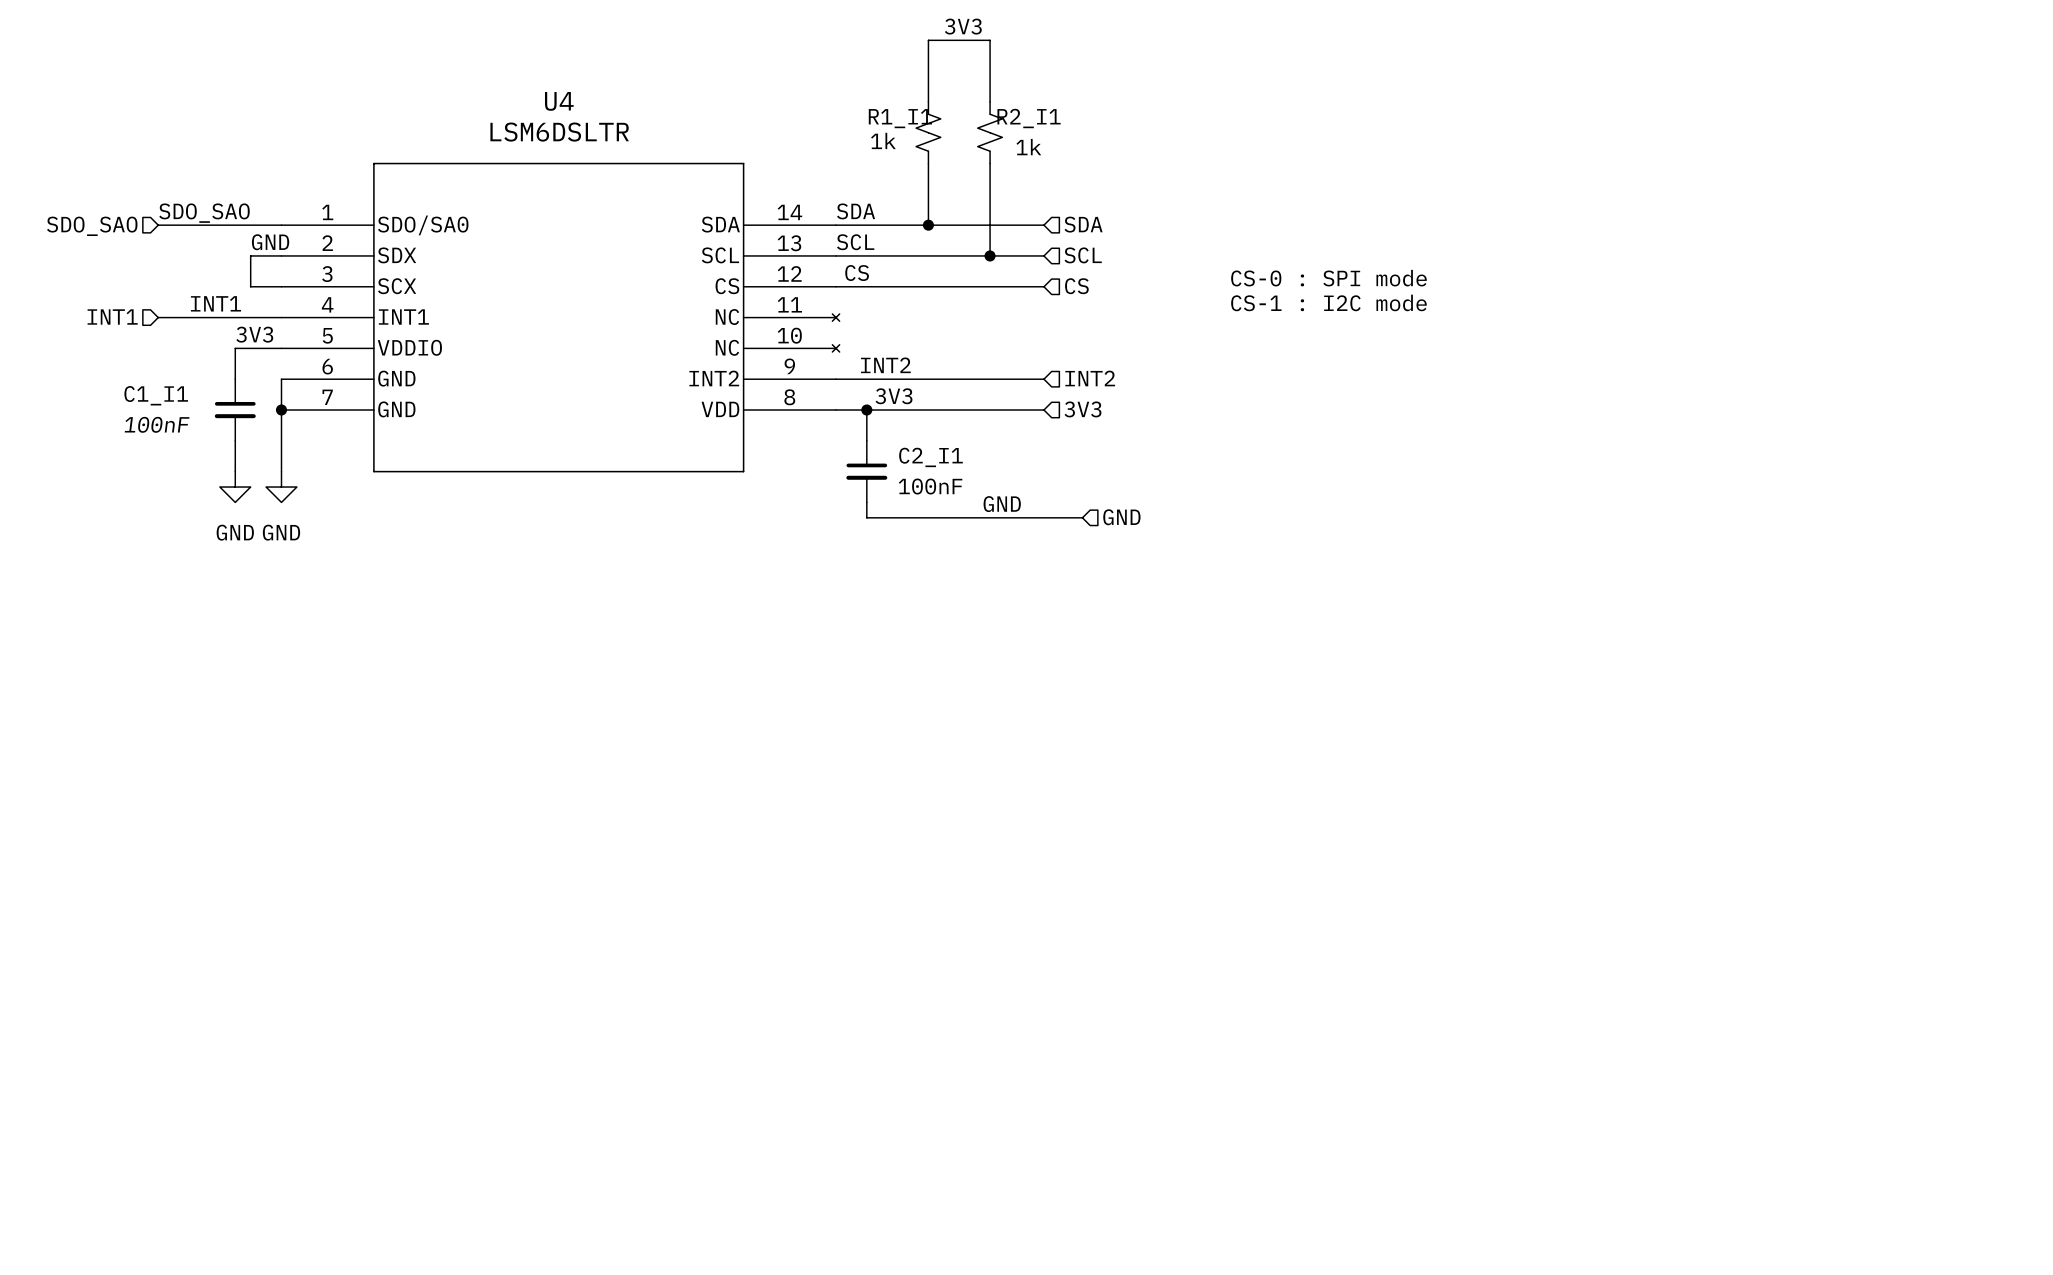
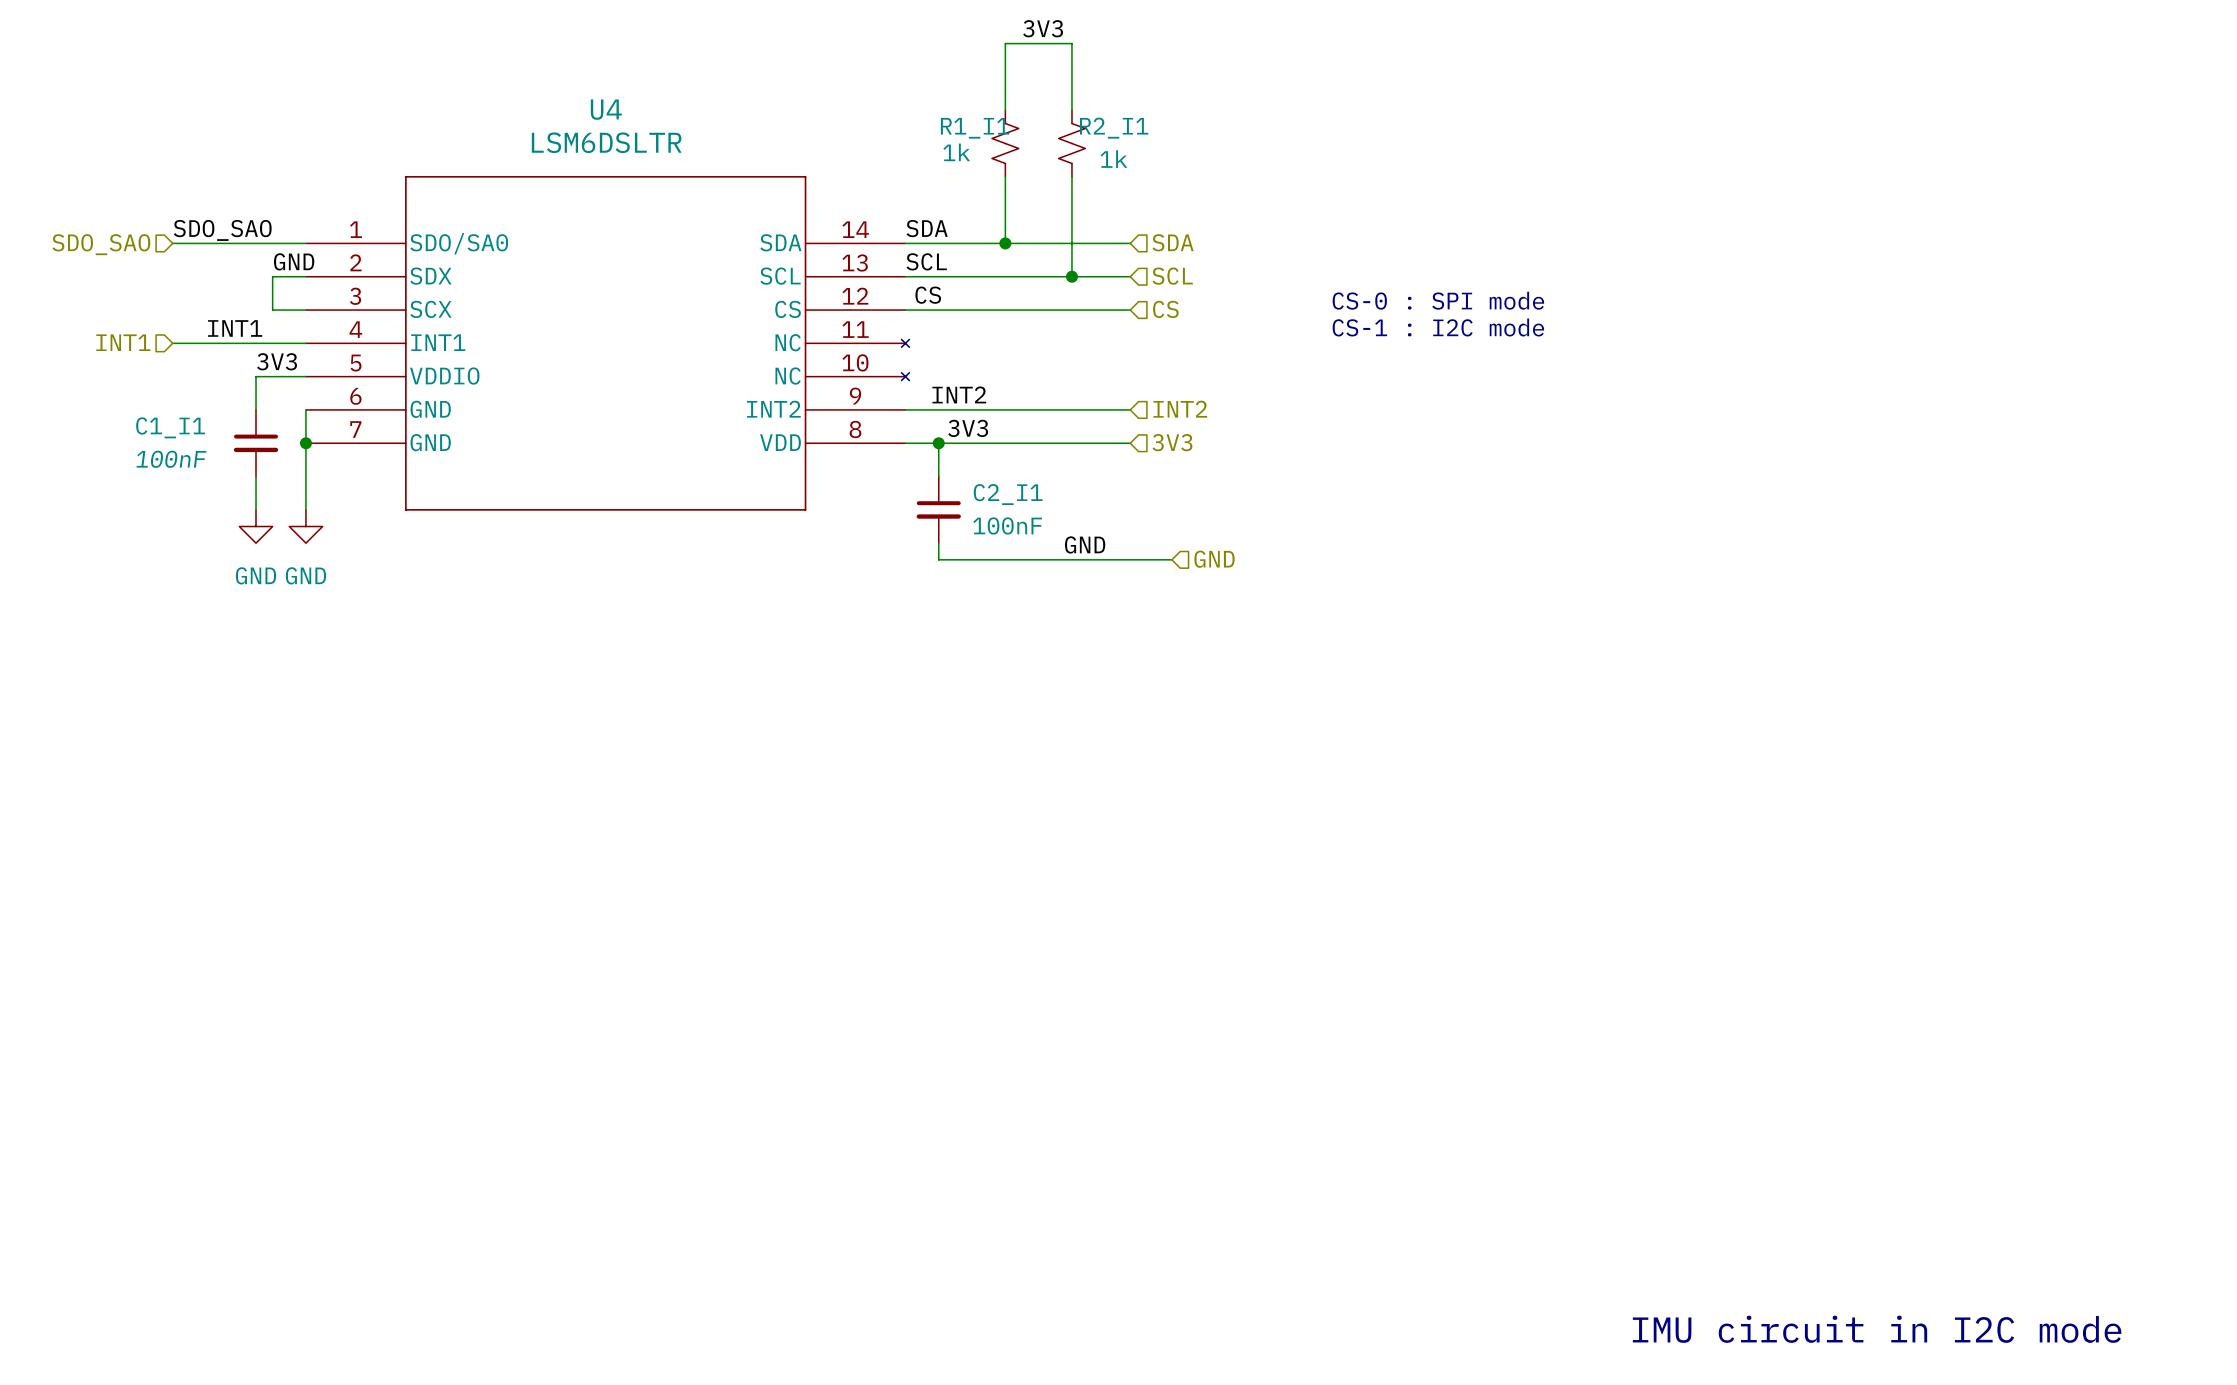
text: none -> IMU circuit in I2C mode (1877, 1329)

